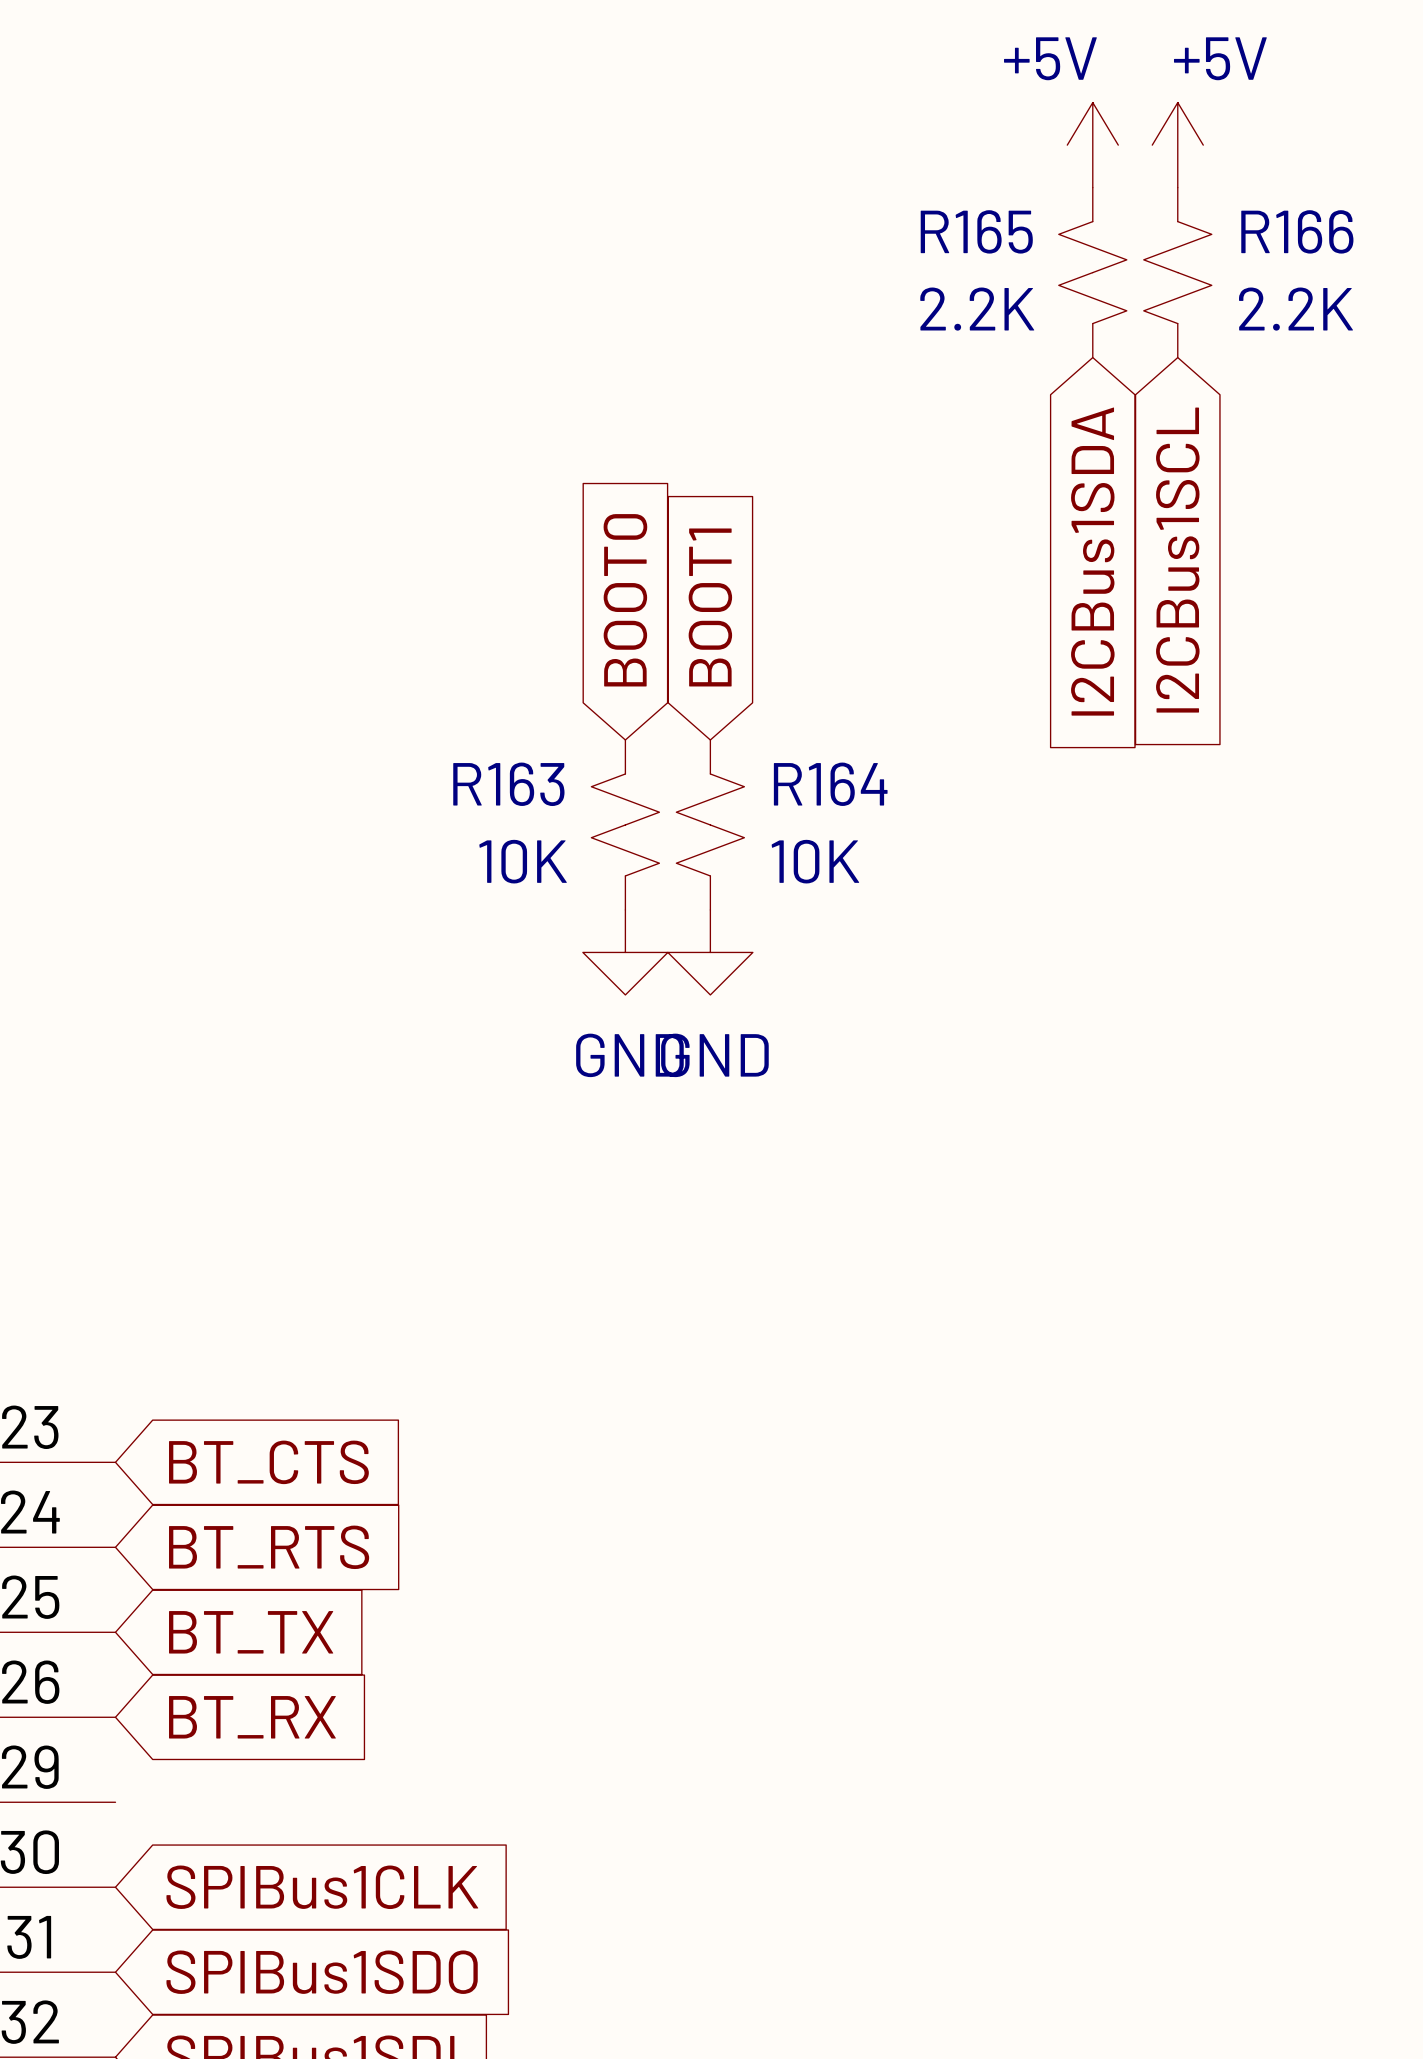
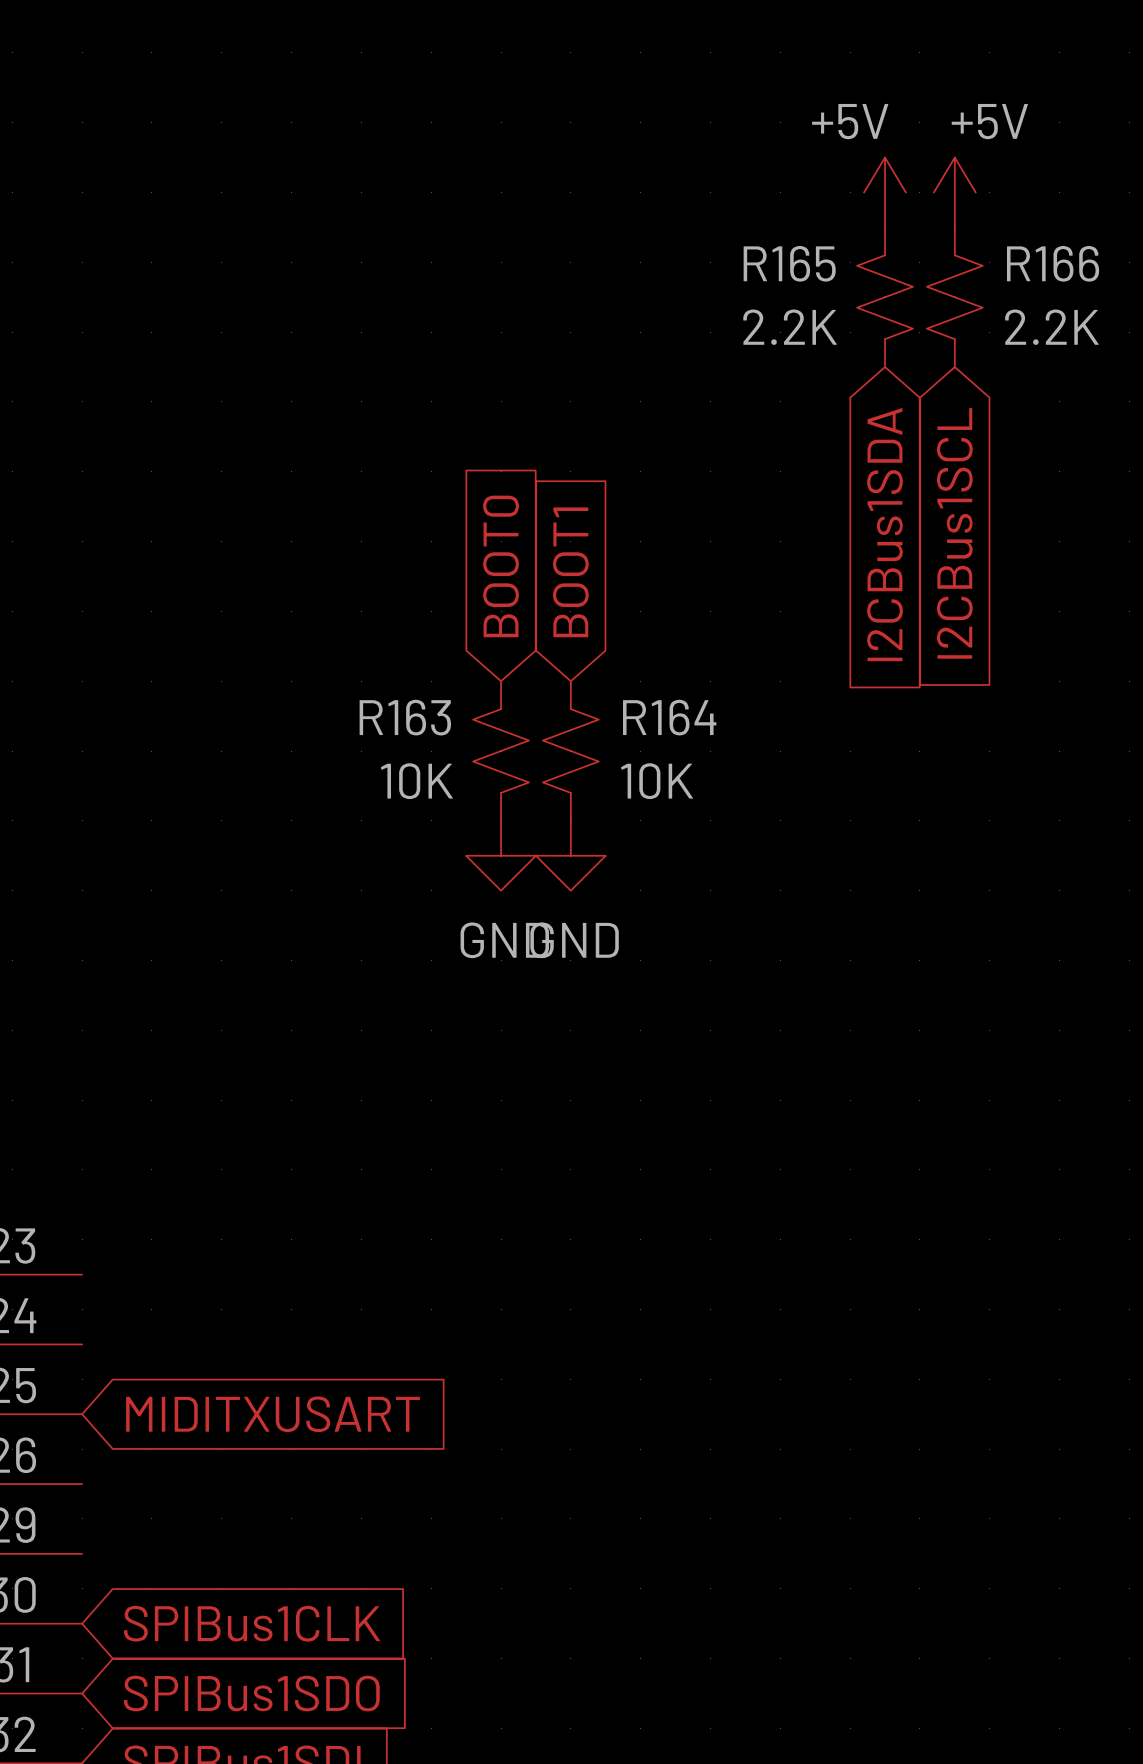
global label: BT_CTS (268, 1462) -> none
global label: BT_RTS (269, 1547) -> none
global label: BT_TX (251, 1632) -> MIDITXUSART (273, 1414)
global label: BT_RX (252, 1717) -> none

